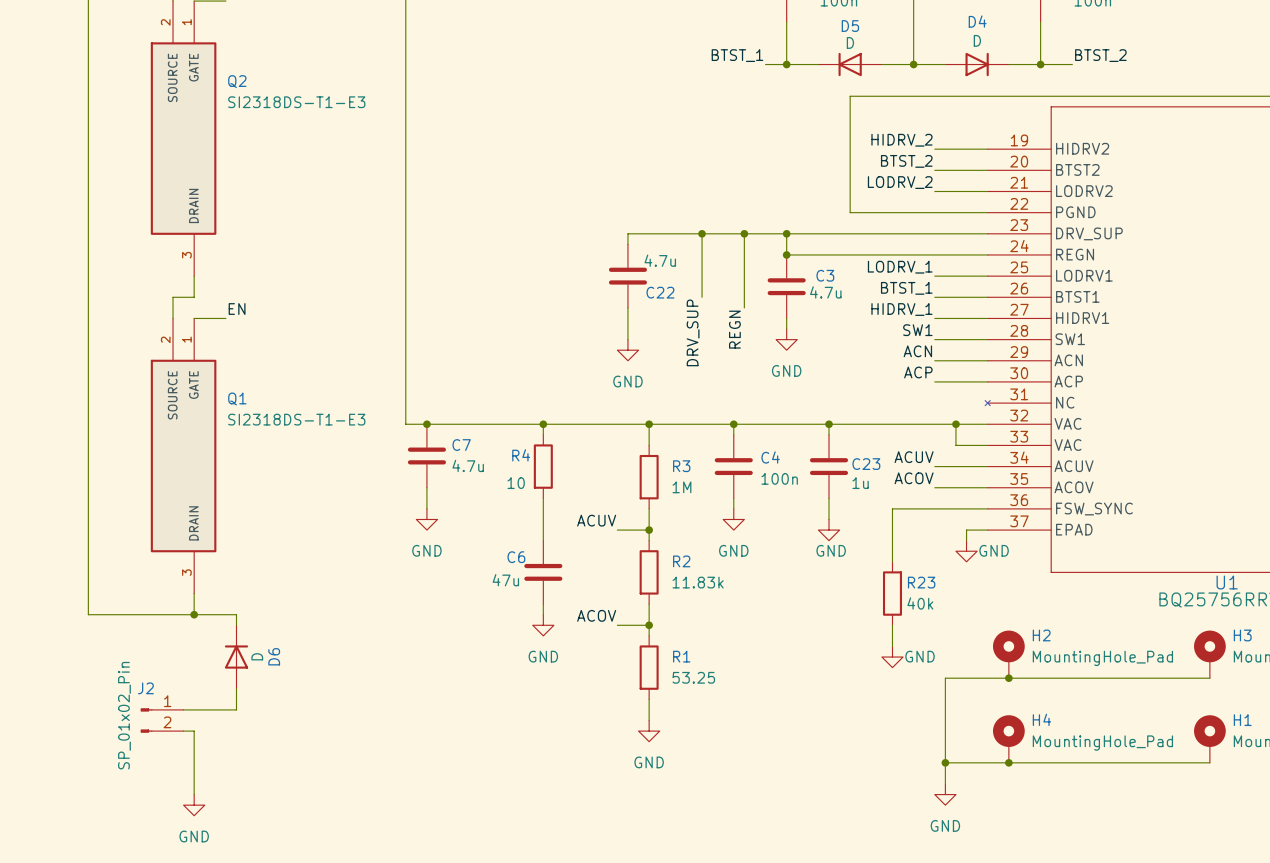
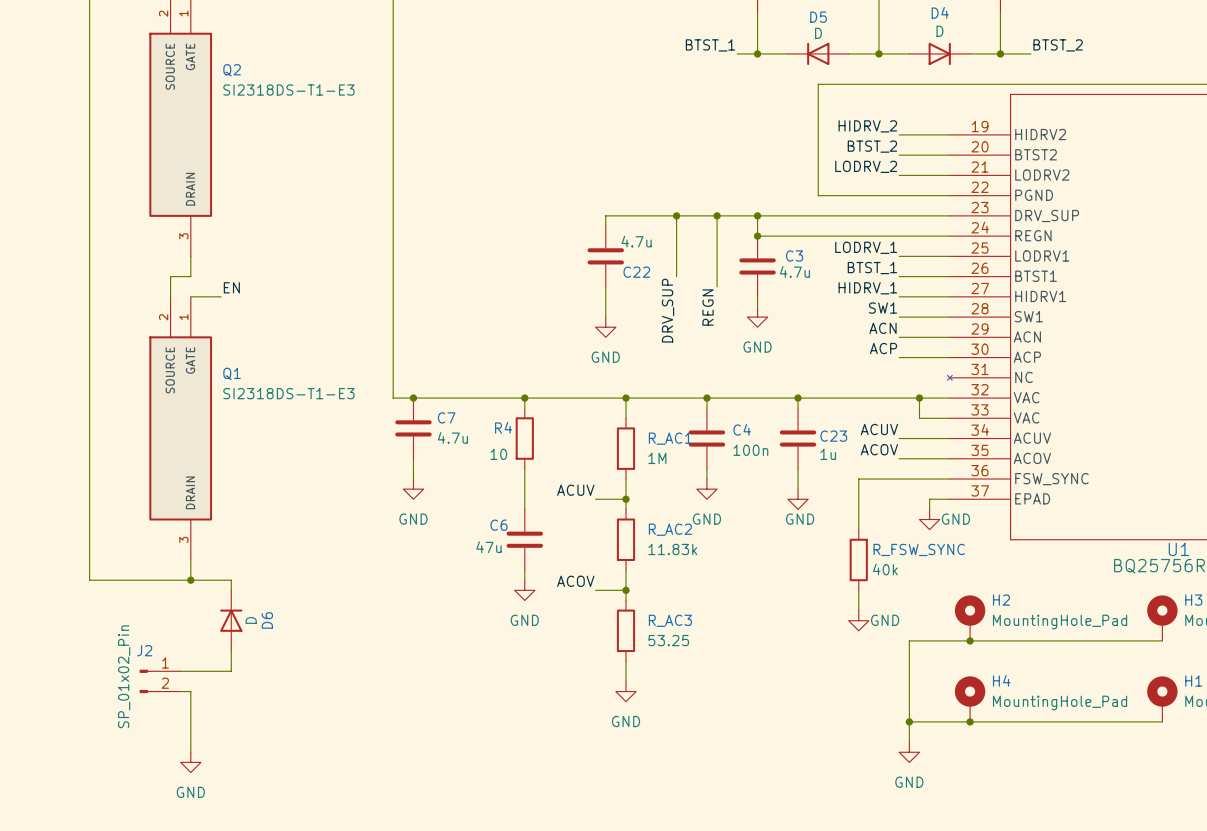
R3 name: R3 (681, 466) -> R_AC1 (670, 438)
R2 name: R2 (681, 561) -> R_AC2 (670, 529)
R23 name: R23 (921, 582) -> R_FSW_SYNC (919, 549)
R1 name: R1 (681, 656) -> R_AC3 (670, 620)

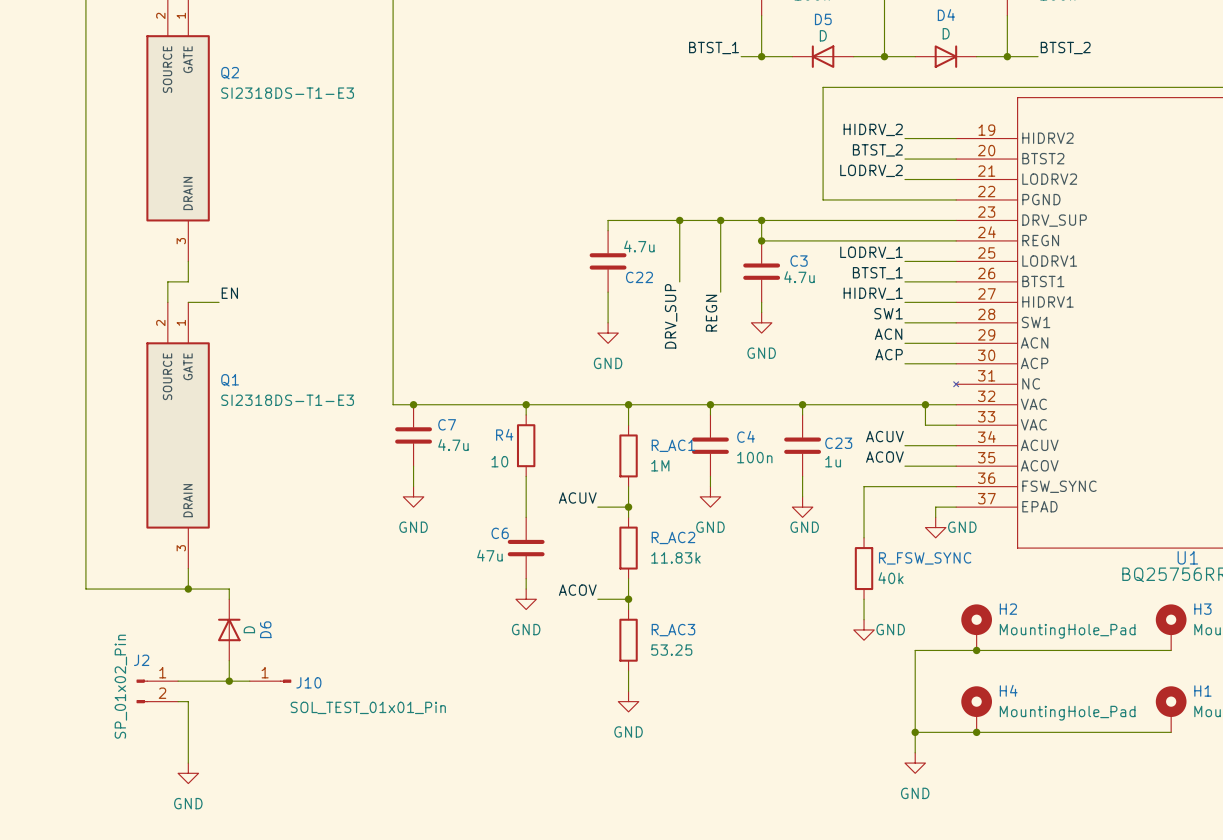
wire: none -> (229, 681) (249, 681)
junction: none -> (229, 681)
J10: none -> SOL_TEST_01x01_Pin (270, 681)

